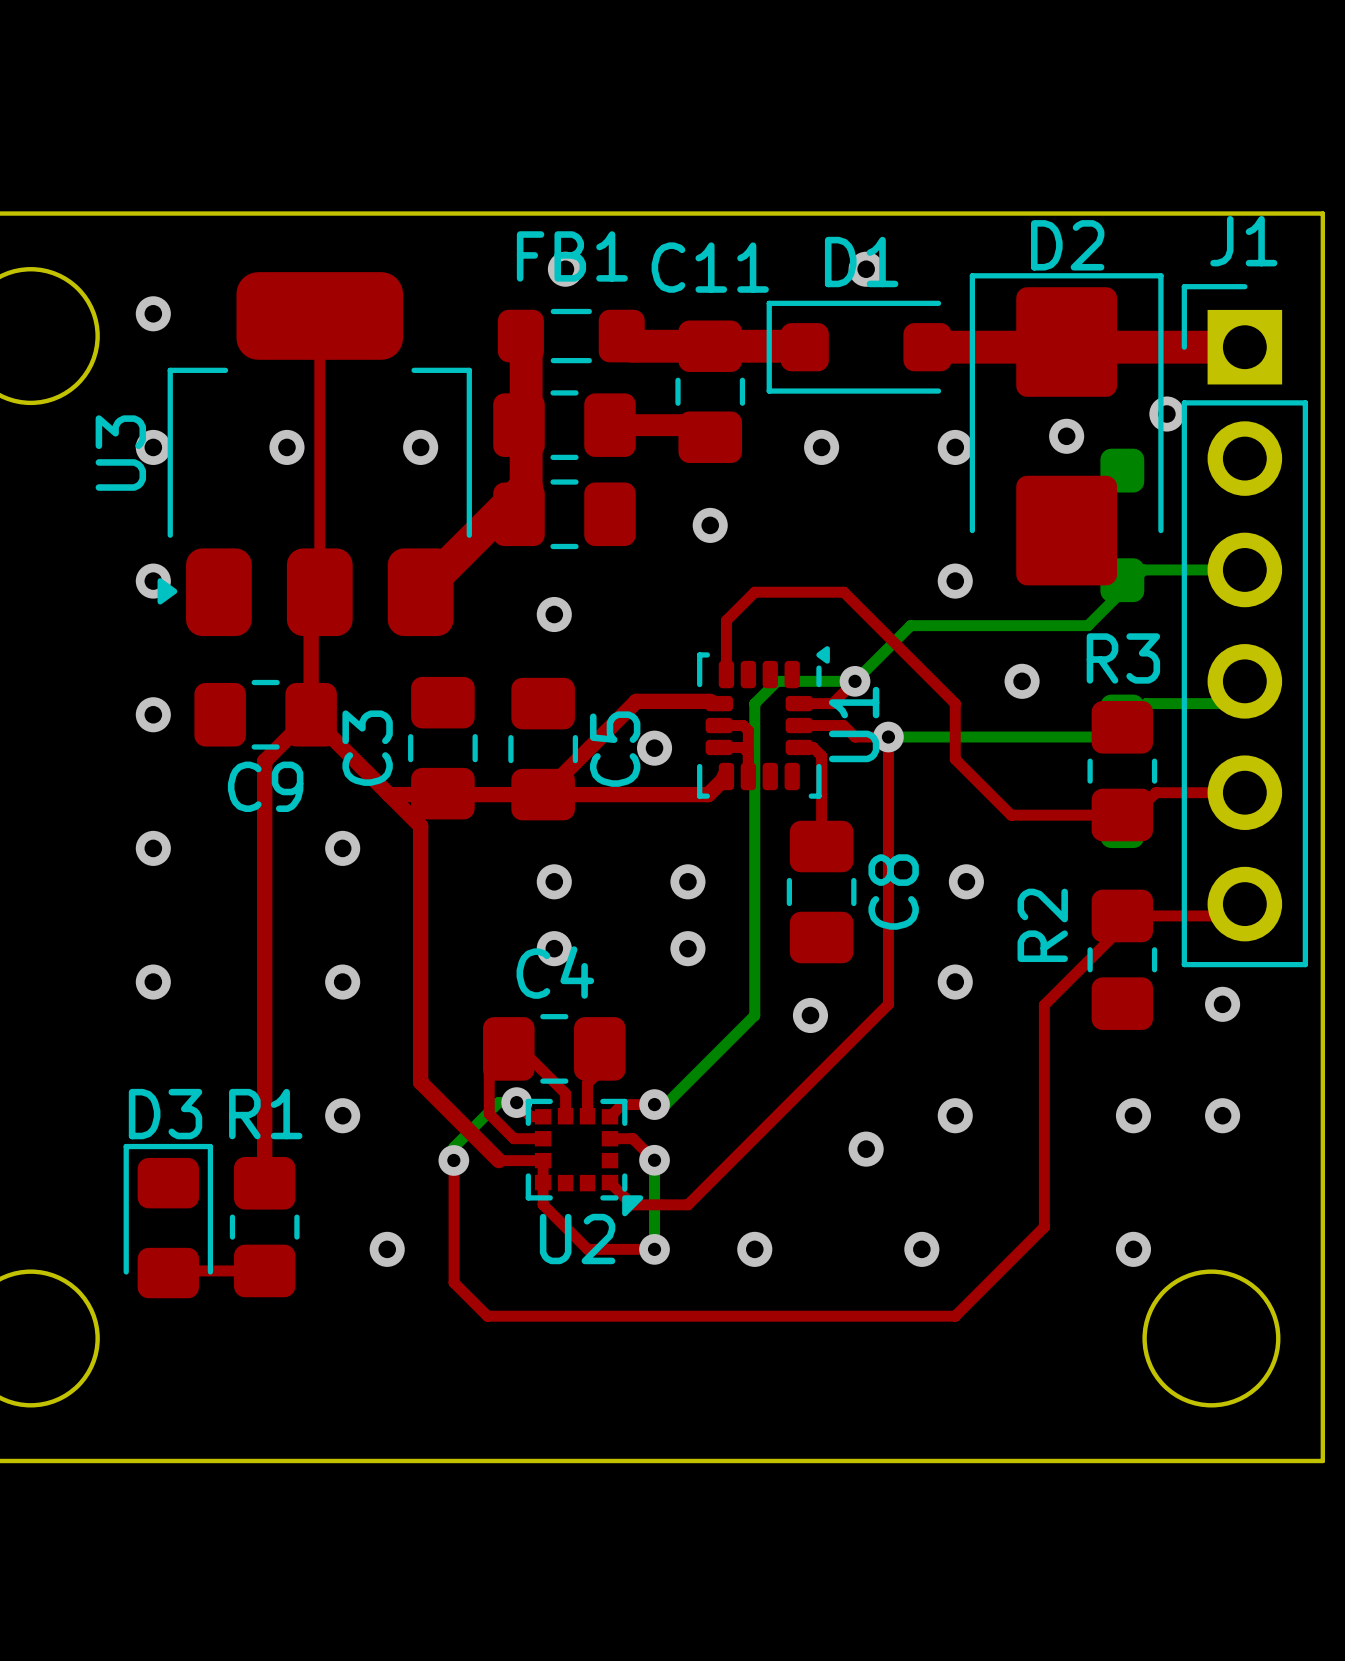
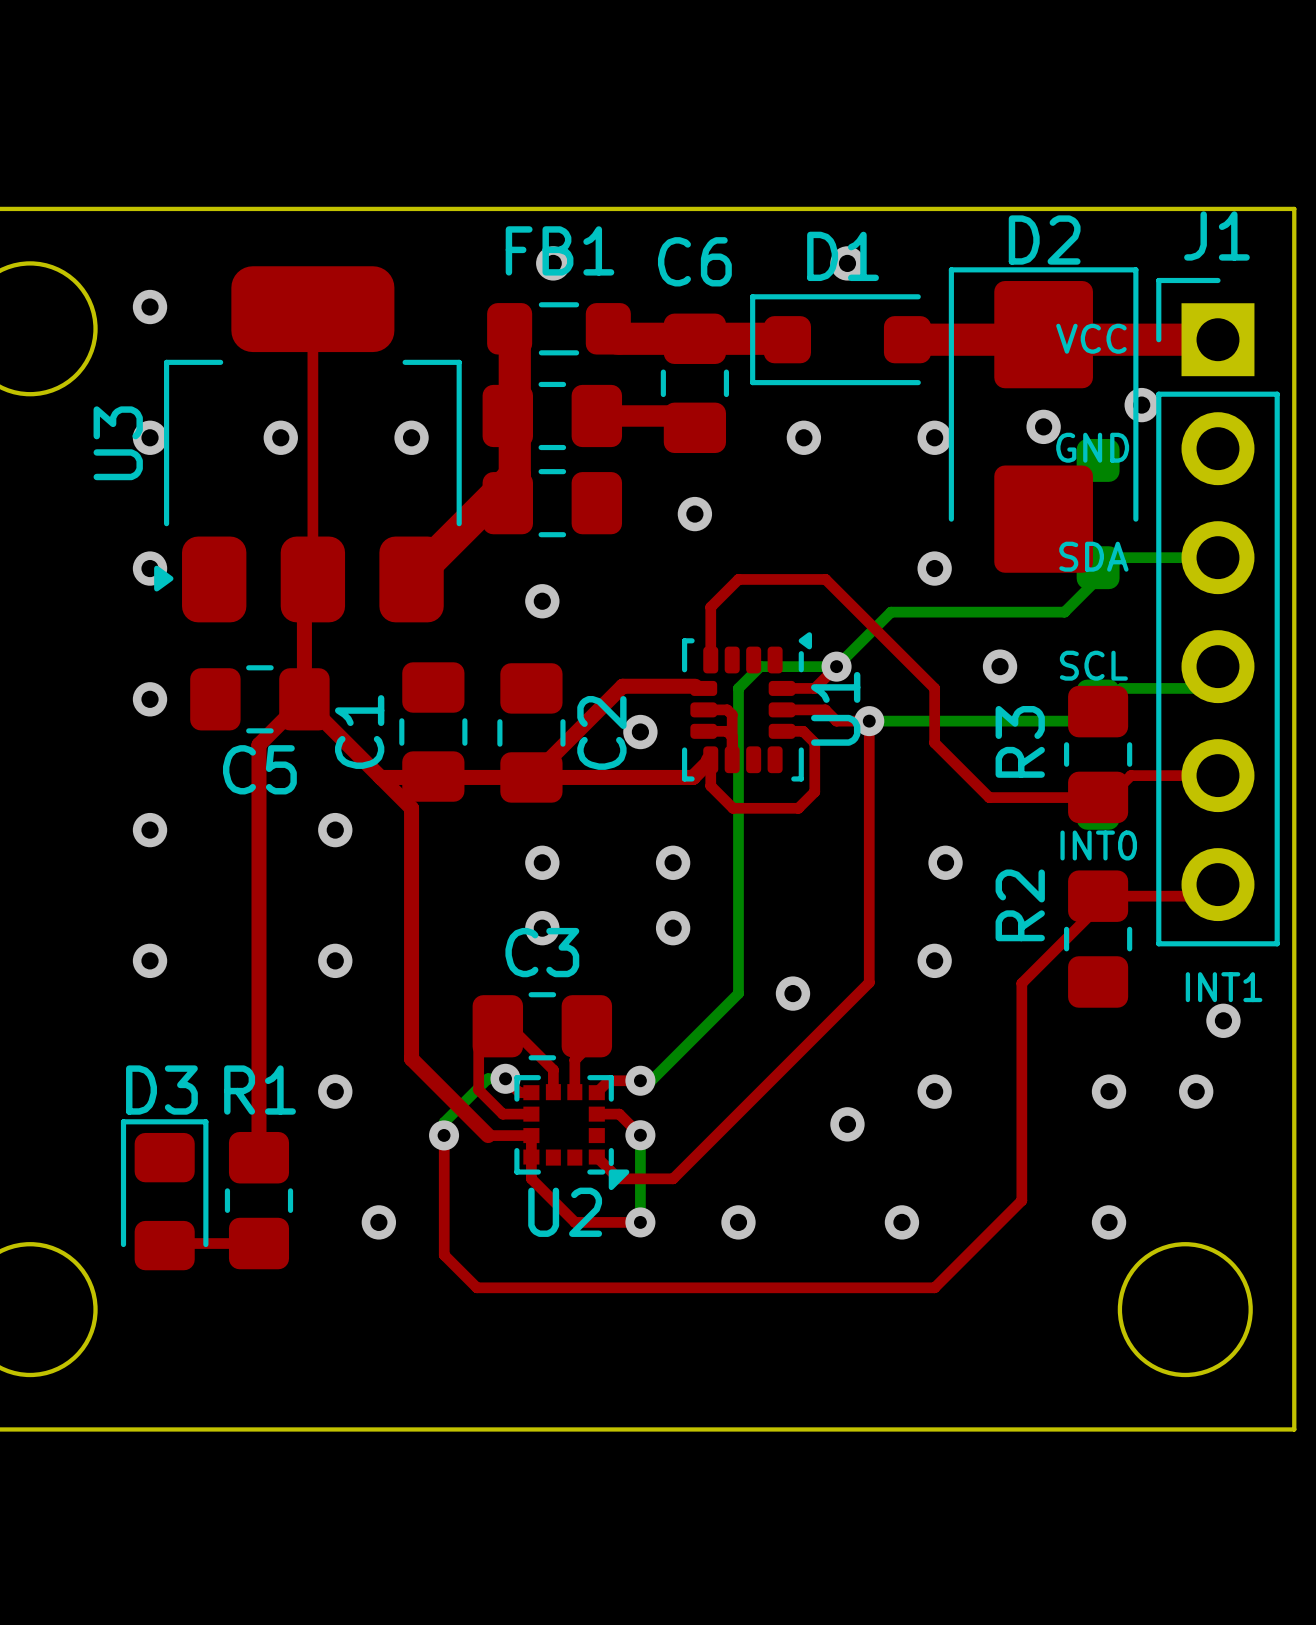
C11 name: C11 (710, 267) -> C6 (694, 261)
text: none -> VCC (1091, 338)
text: none -> GND (1092, 447)
text: none -> SDA (1093, 556)
R3 name rotation: 0° (1123, 658) -> 90° counterclockwise (1020, 741)
R3 name position: R3 (1123, 658) -> R3 (1020, 741)
text: none -> SCL (1093, 665)
top track: (813, 747) (821, 756) (821, 846) -> (795, 731) (803, 731) (814, 742) (814, 791) (798, 808) (733, 808) (710, 786) (710, 759)
C3 name: C3 (367, 748) -> C1 (359, 732)
C5 name: C5 (615, 749) -> C2 (601, 732)
C9 name: C9 (265, 786) -> C5 (259, 769)
text: none -> INT0 (1098, 845)
C8: (821, 892) -> none
C4 name: C4 (555, 972) -> C3 (542, 952)
via position: (1222, 1004) -> (1223, 1020)
text: none -> INT1 (1224, 987)

